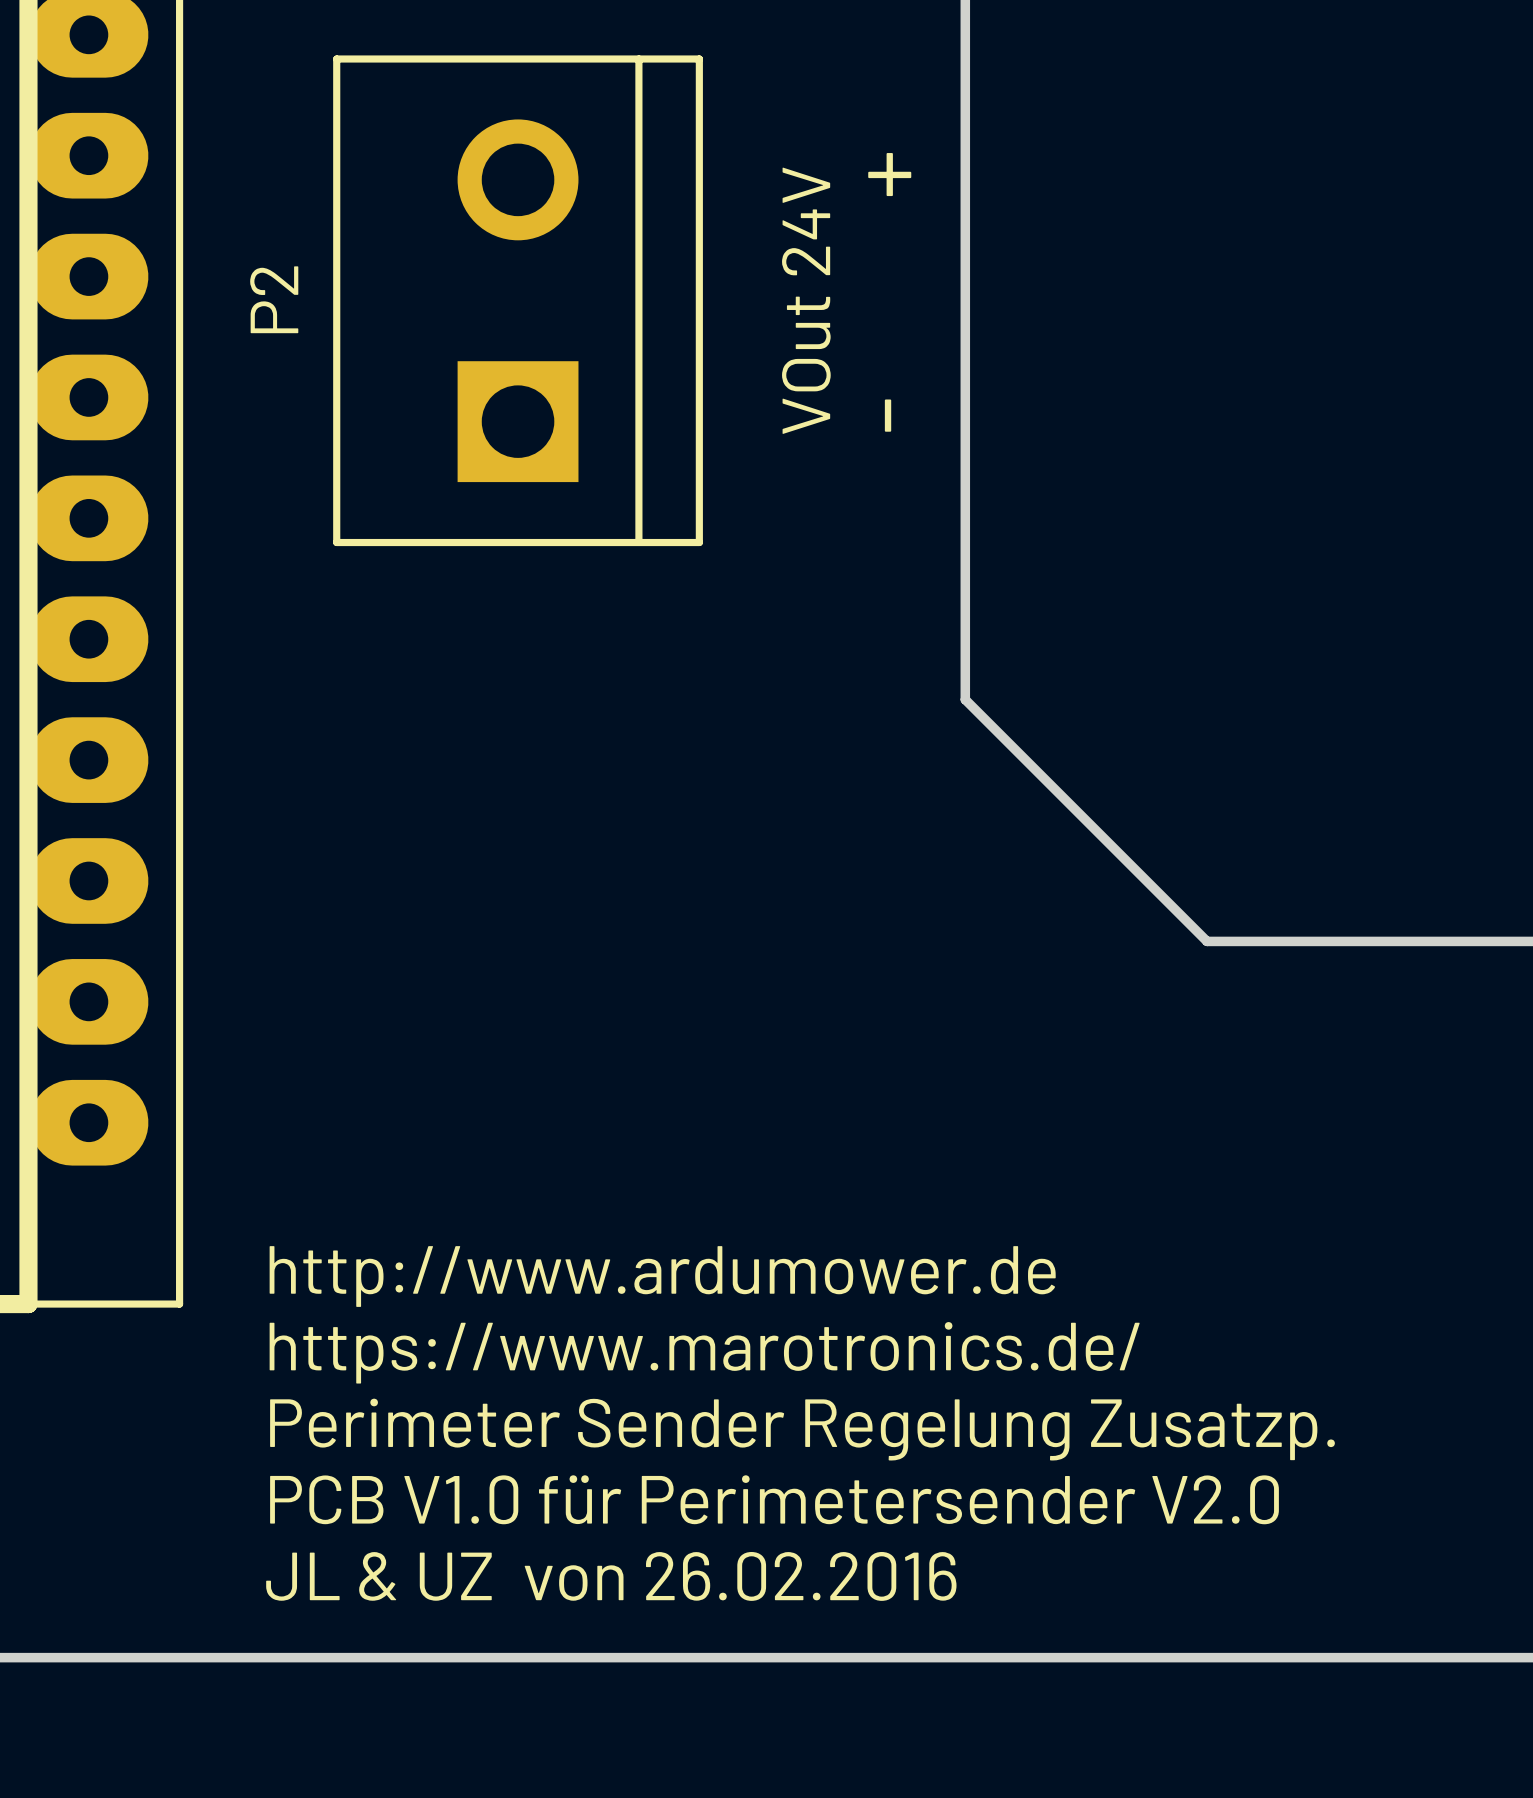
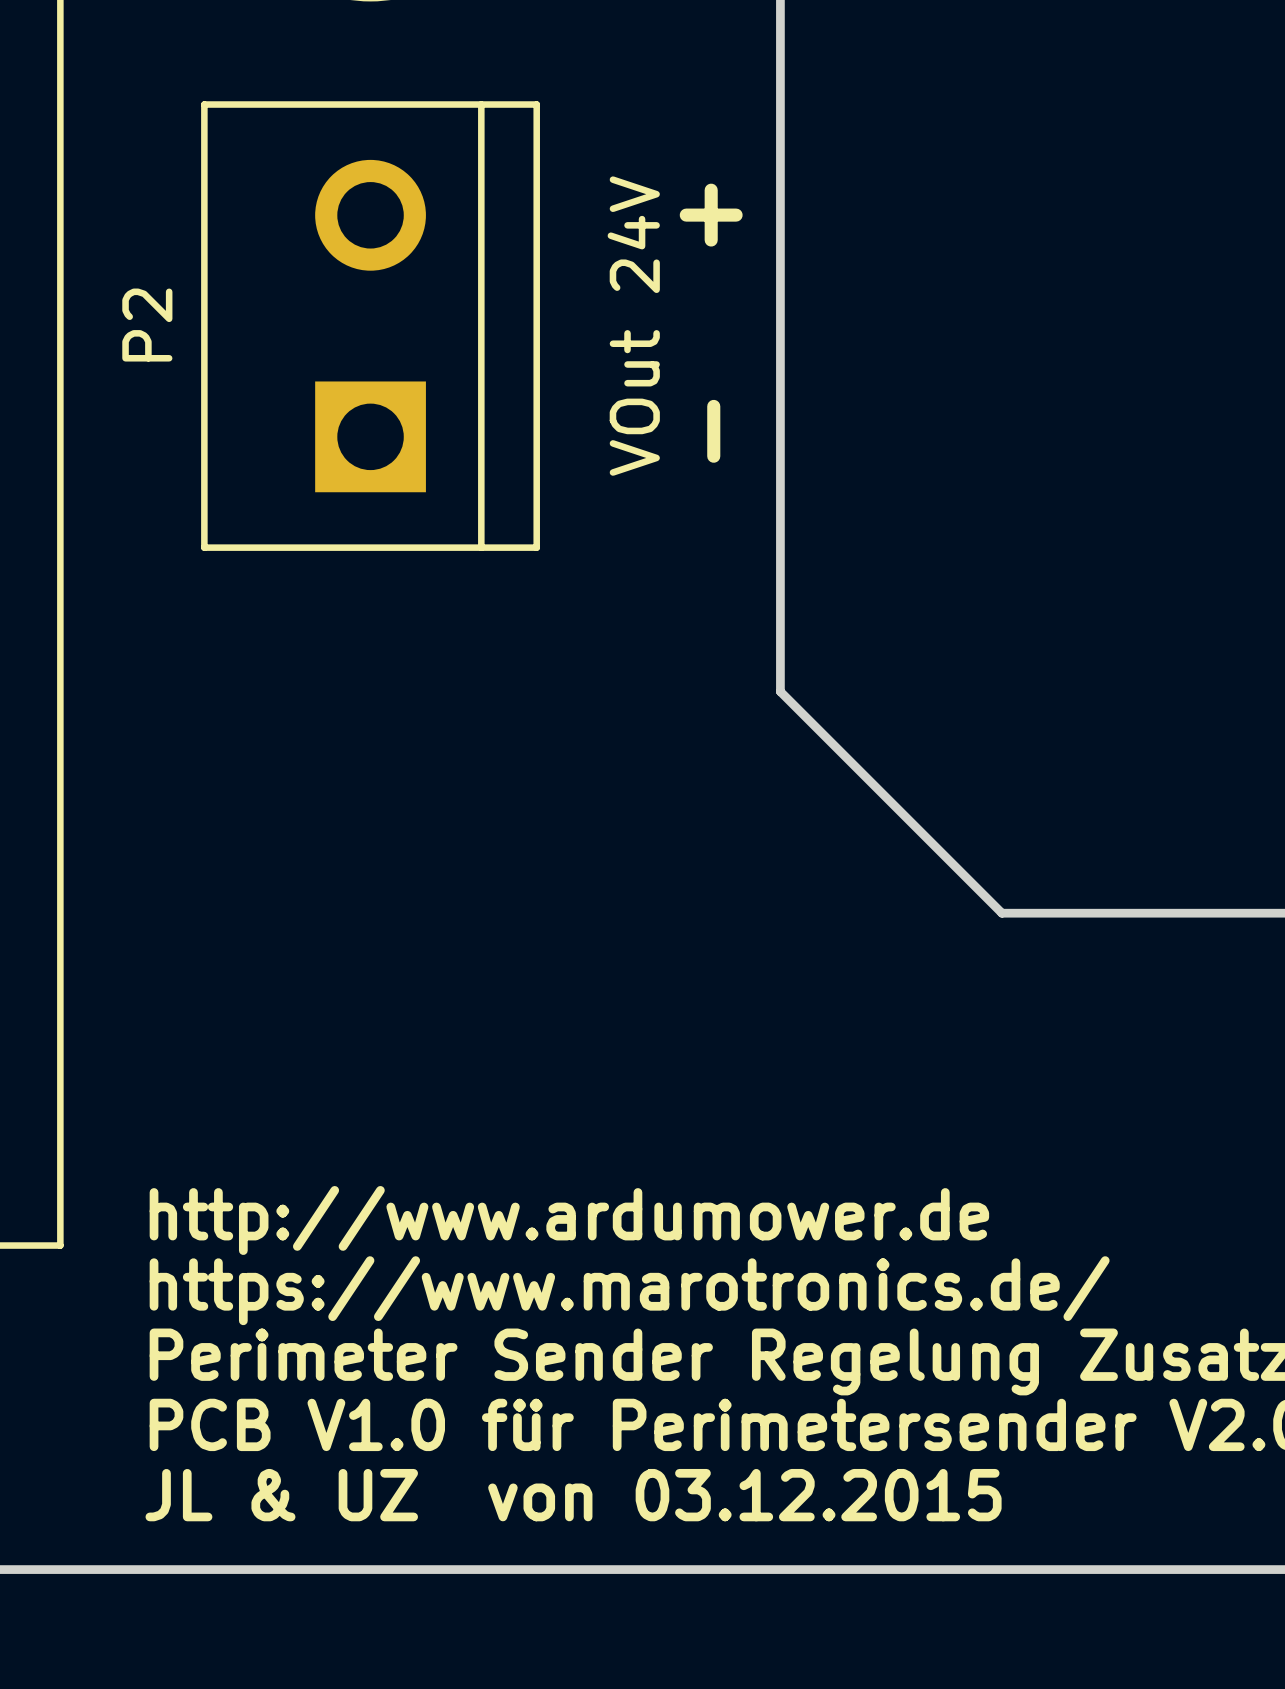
text: JL & UZ von 26.02.2016 (611, 1576) -> JL & UZ von 03.12.2015 (573, 1495)

